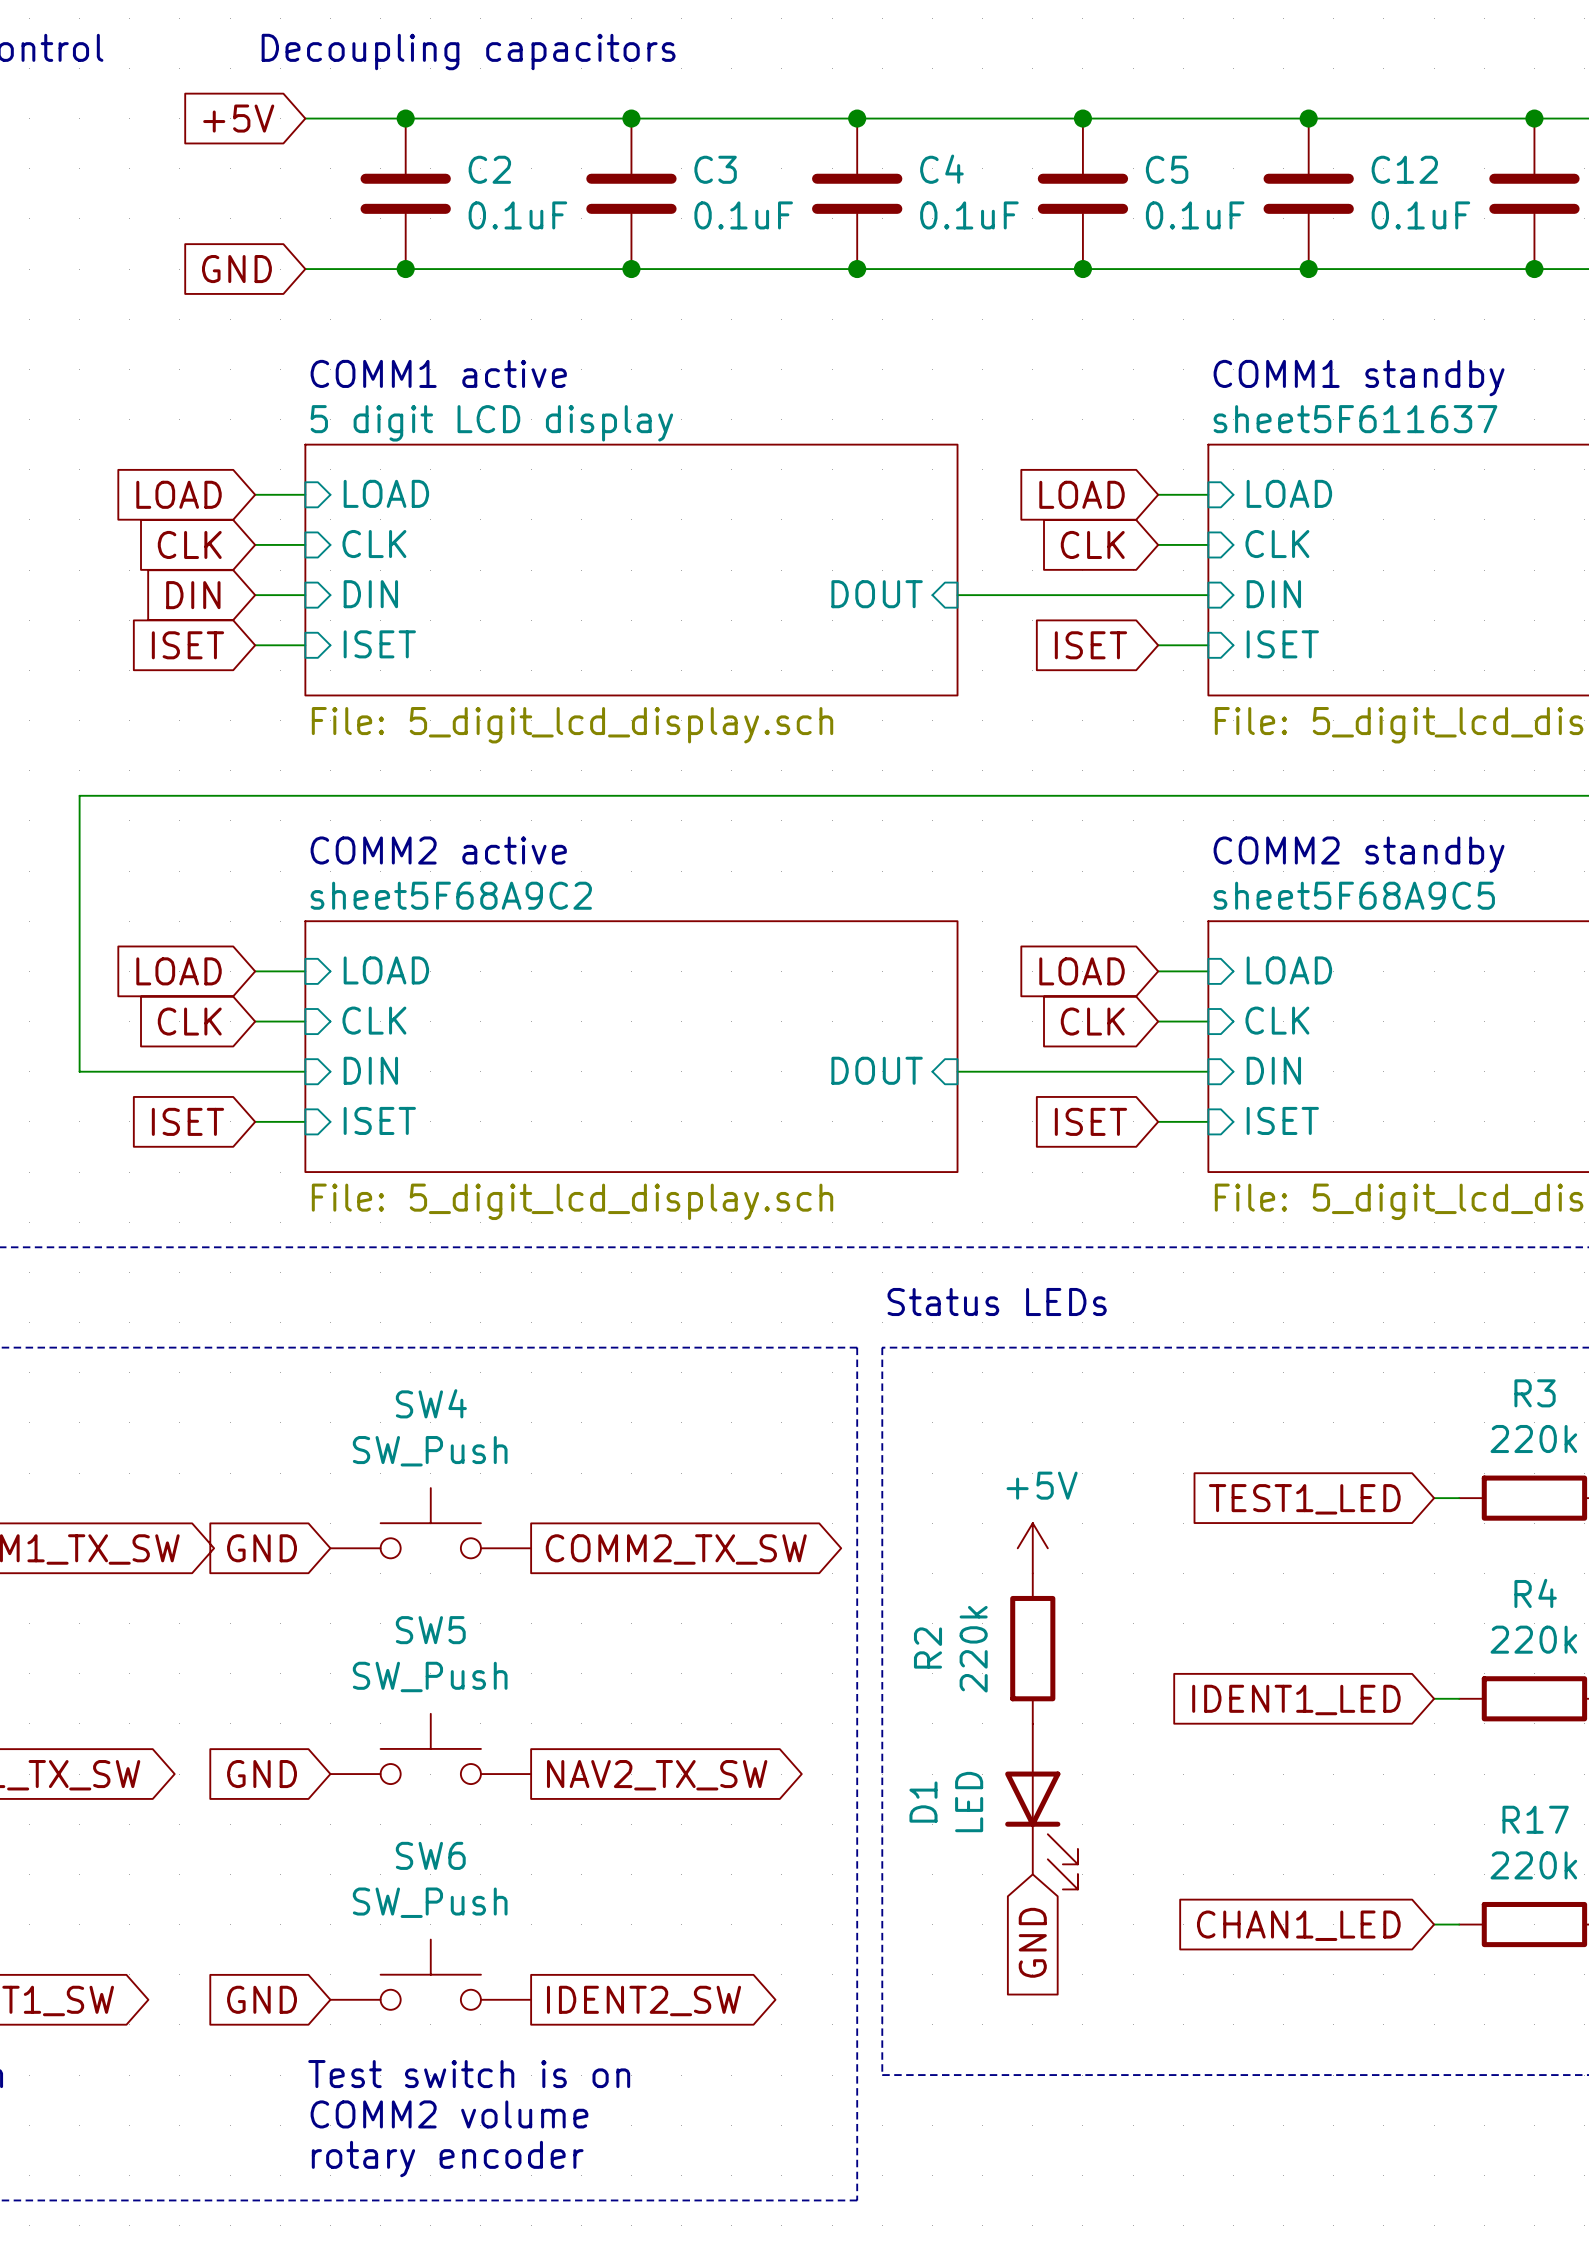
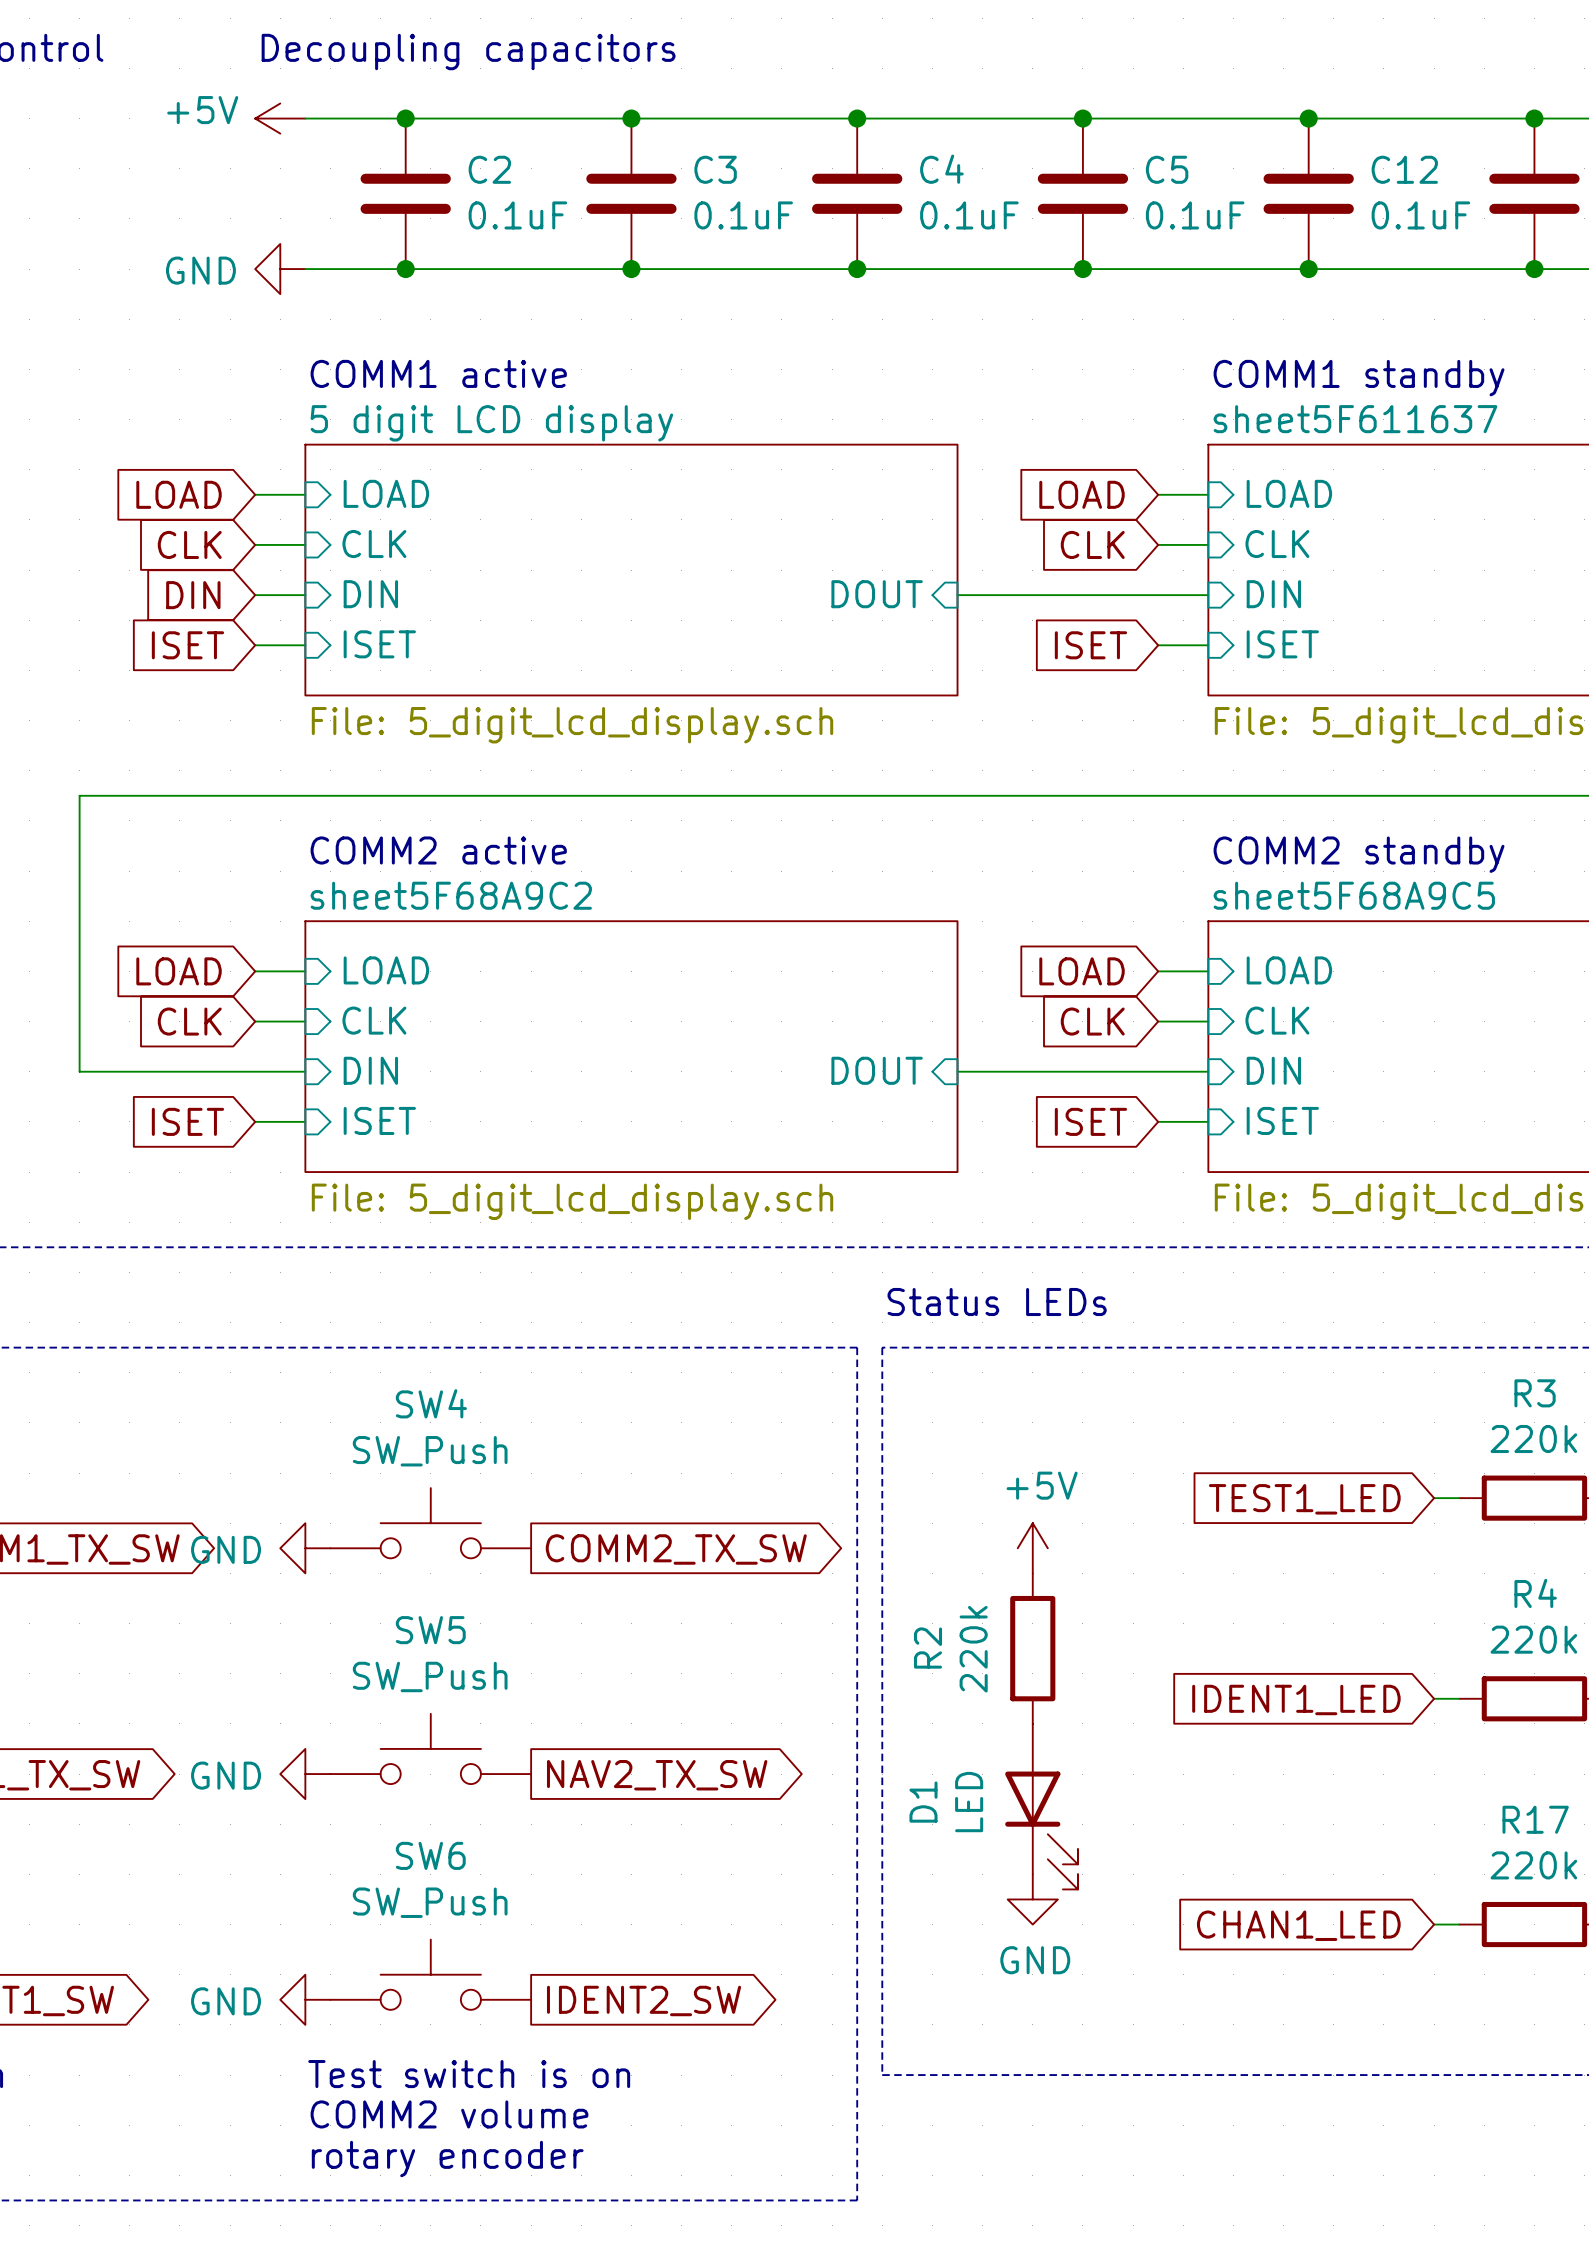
global label: +5V (238, 118) -> none
power symbol: none -> +5V (280, 118)
global label: GND (236, 269) -> none
power symbol: none -> GND (280, 269)
global label: GND (262, 1548) -> none
power symbol: none -> GND (305, 1548)
global label: GND (262, 1774) -> none
power symbol: none -> GND (305, 1774)
power symbol: none -> GND (1032, 1899)
global label: GND (1032, 1942) -> none
global label: GND (262, 1999) -> none
power symbol: none -> GND (305, 1999)

